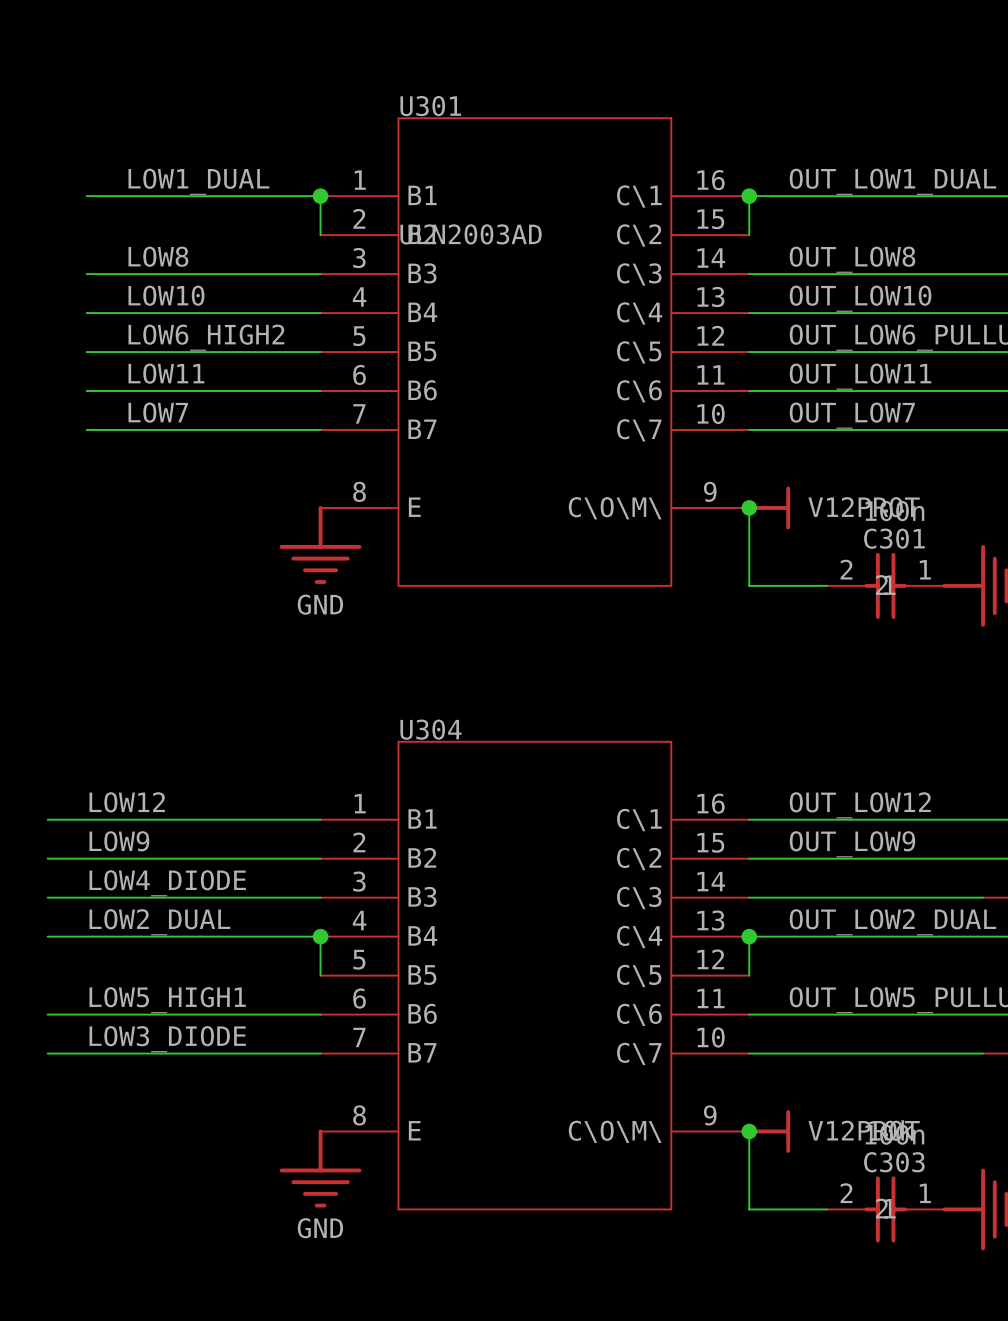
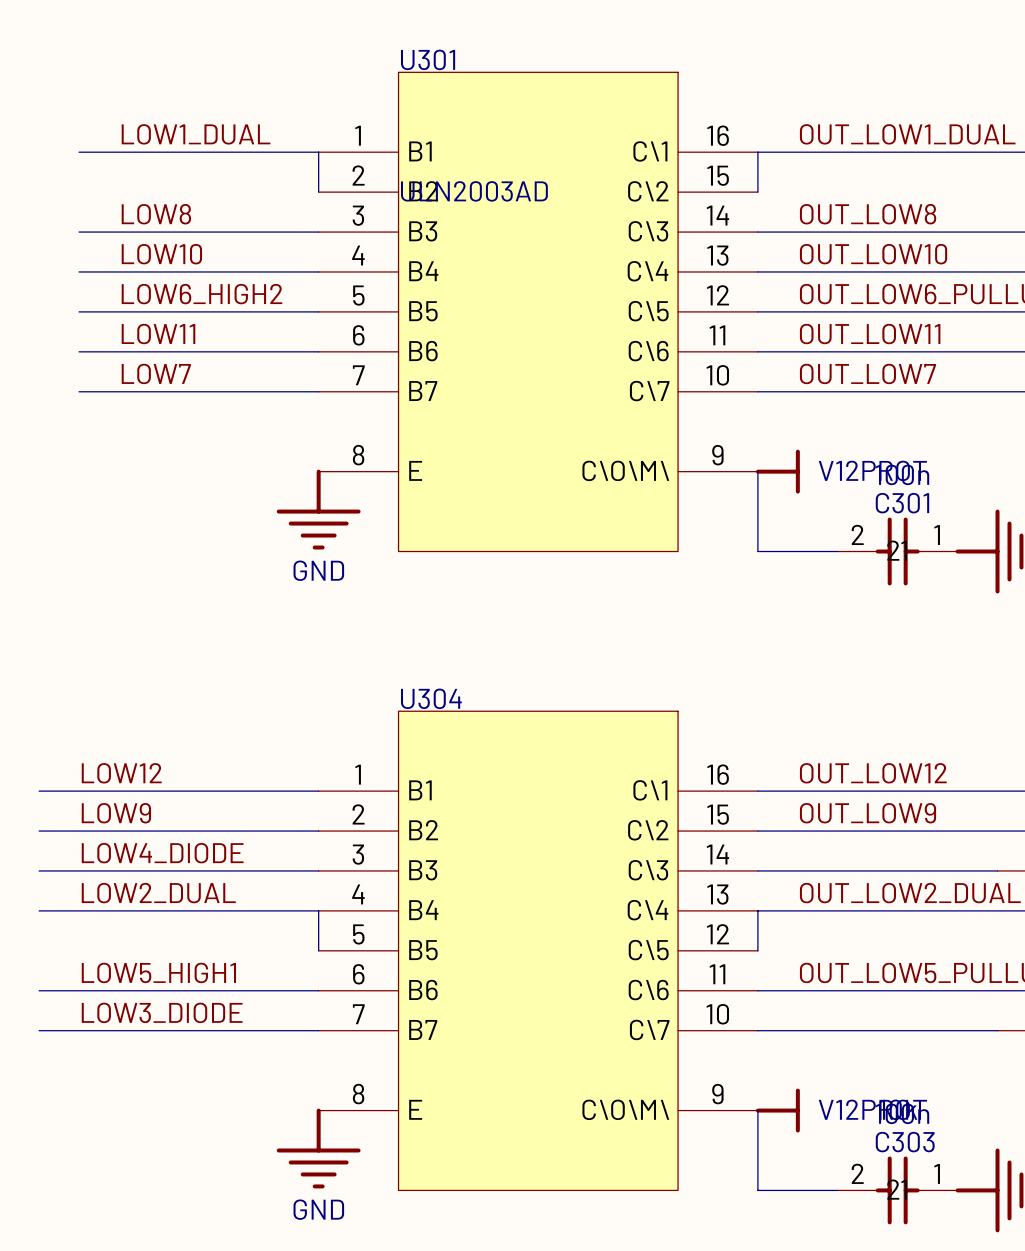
junction: (320, 196) -> none
junction: (749, 196) -> none
junction: (749, 507) -> none
junction: (320, 936) -> none
junction: (749, 936) -> none
junction: (749, 1131) -> none

